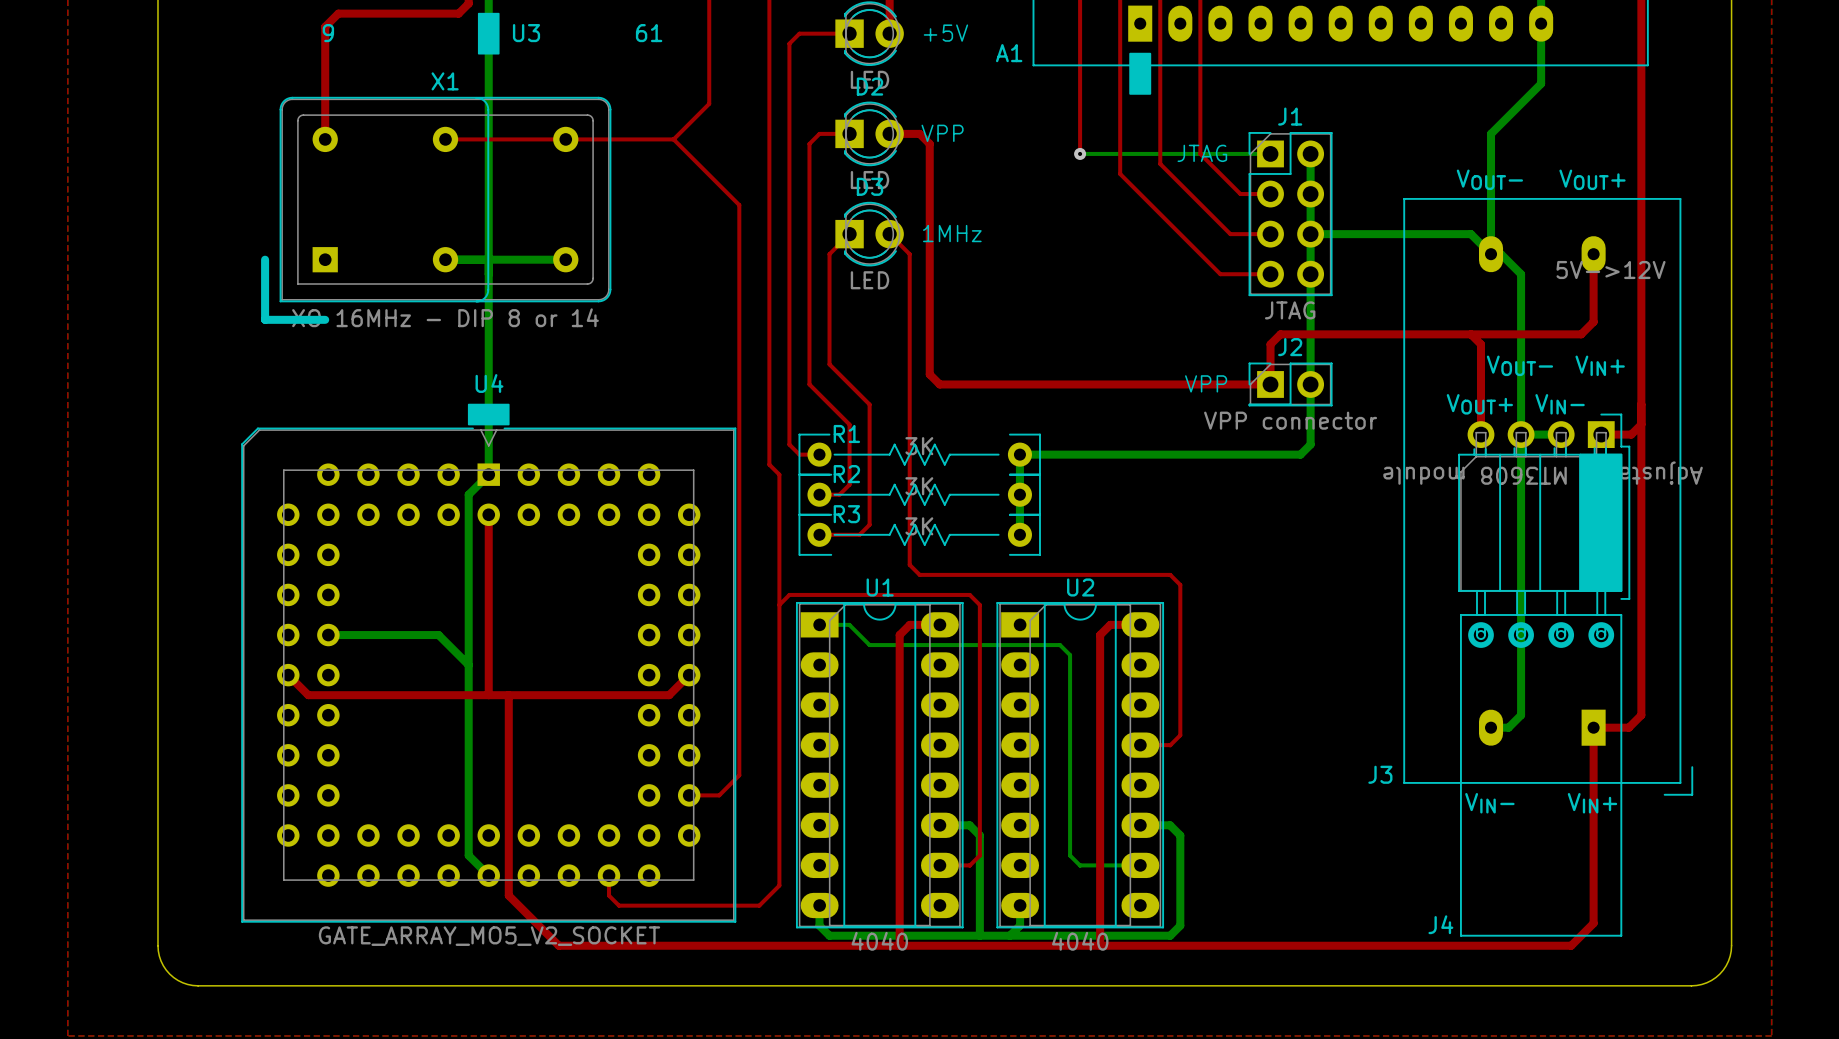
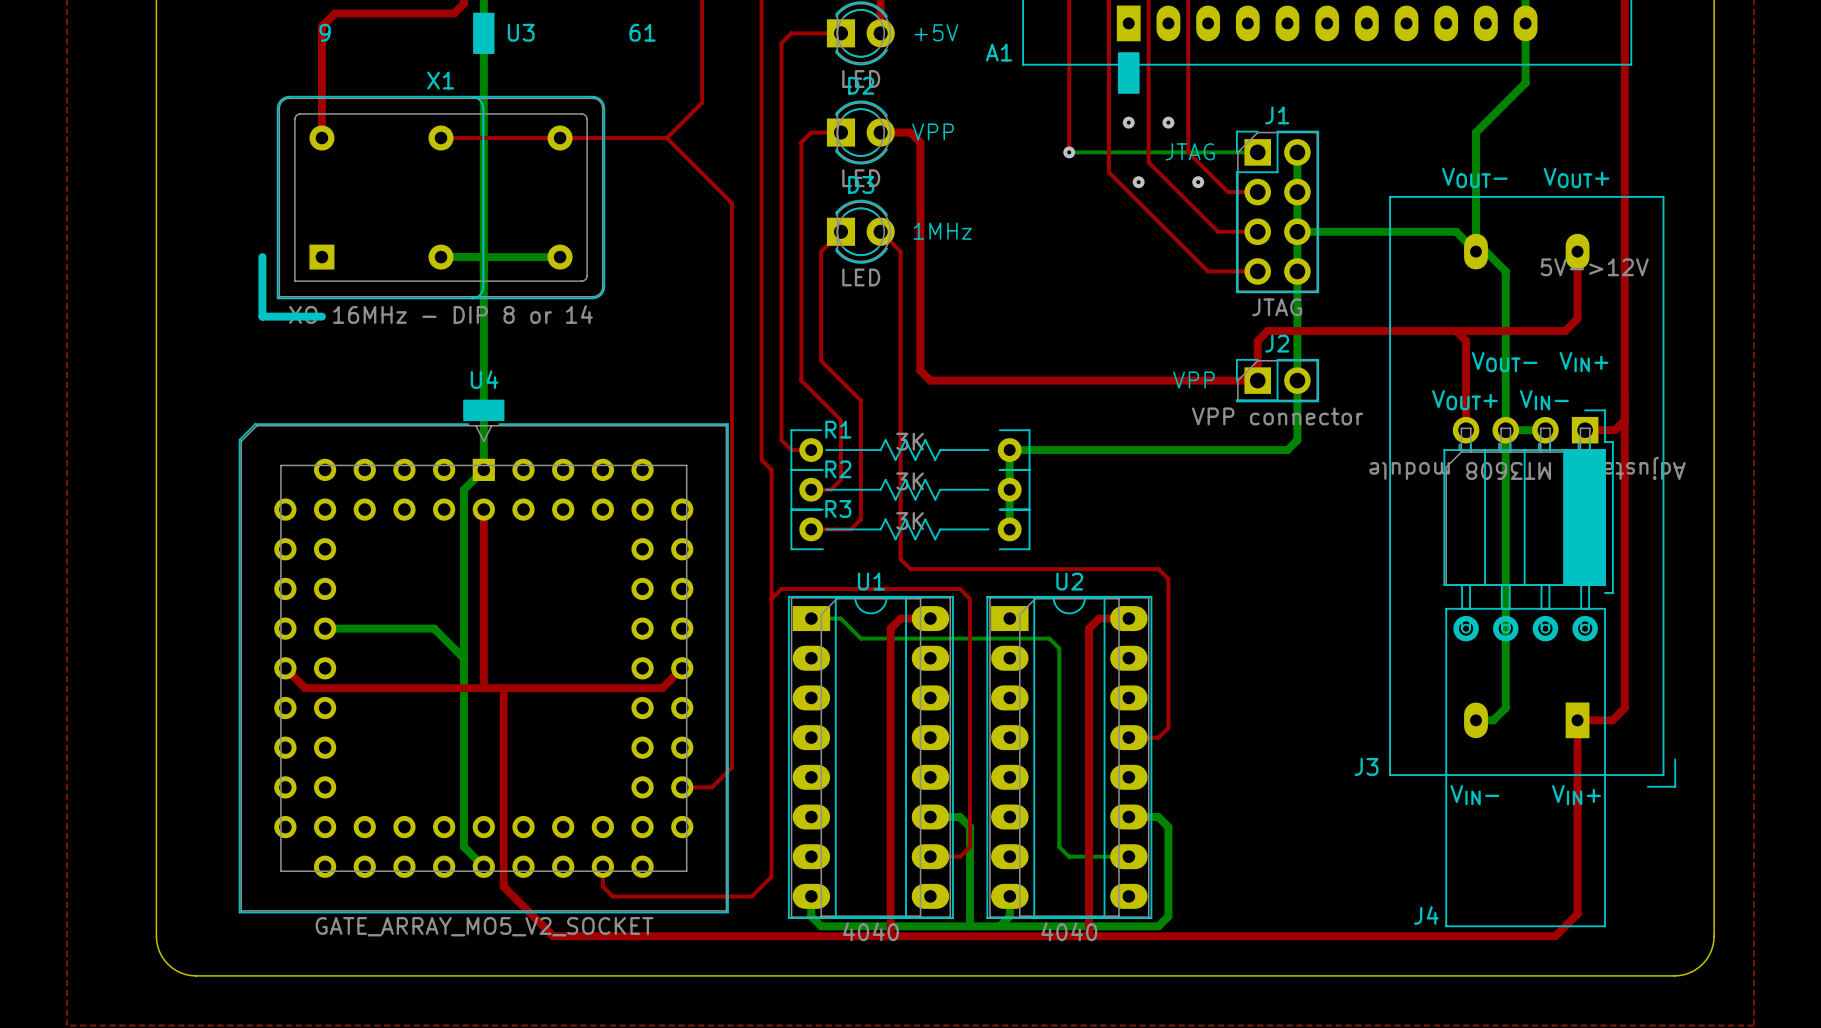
via: none -> (1128, 122)
via: none -> (1168, 122)
via: none -> (1138, 182)
via: none -> (1198, 182)

